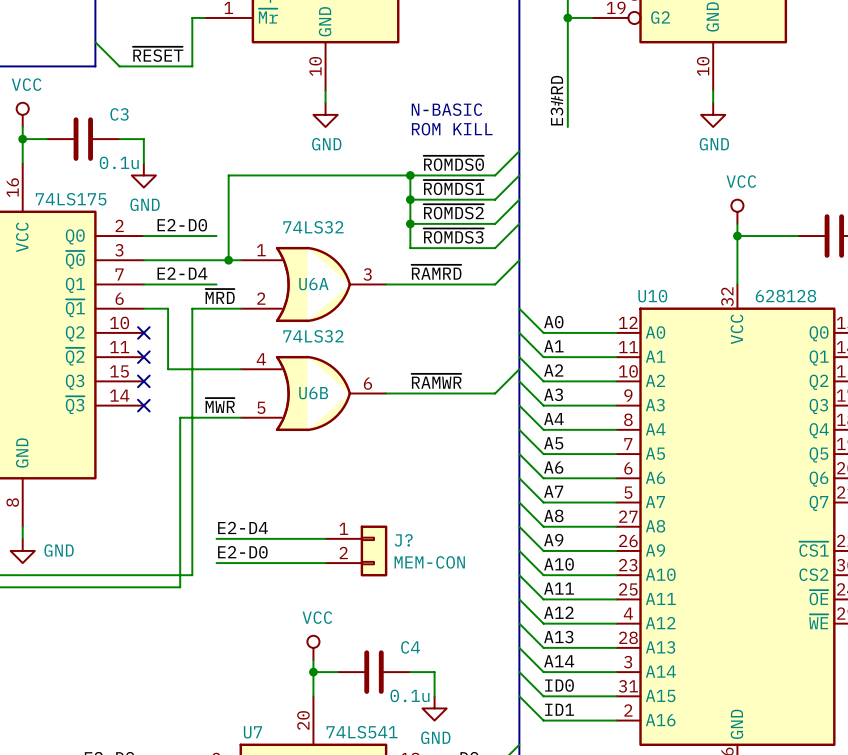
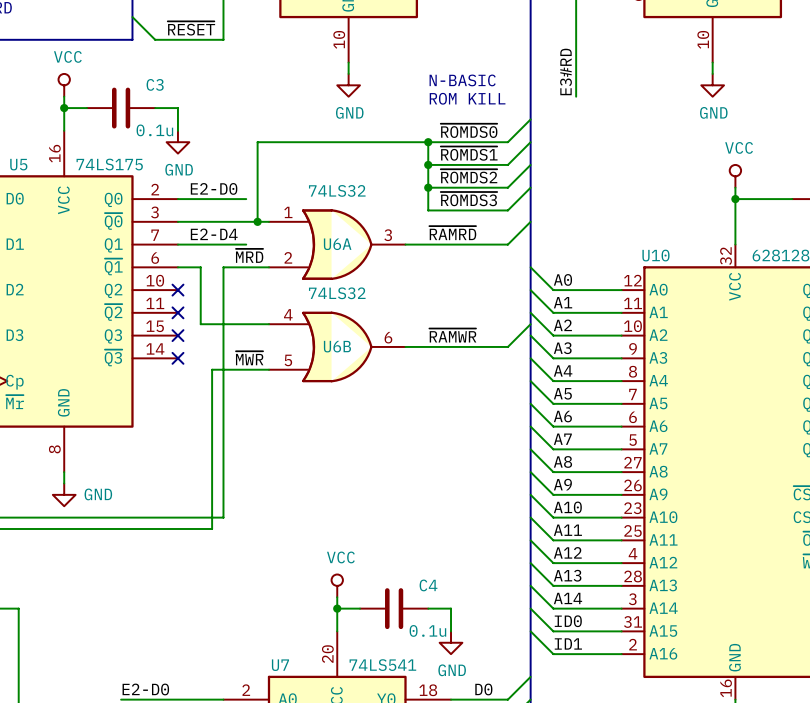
label: E2-D4 (243, 527) -> none
wire: (216, 538) (325, 538) -> none
J?: MEM-CON (356, 550) -> none
label: E2-D0 (242, 552) -> none
wire: (216, 563) (325, 563) -> none

